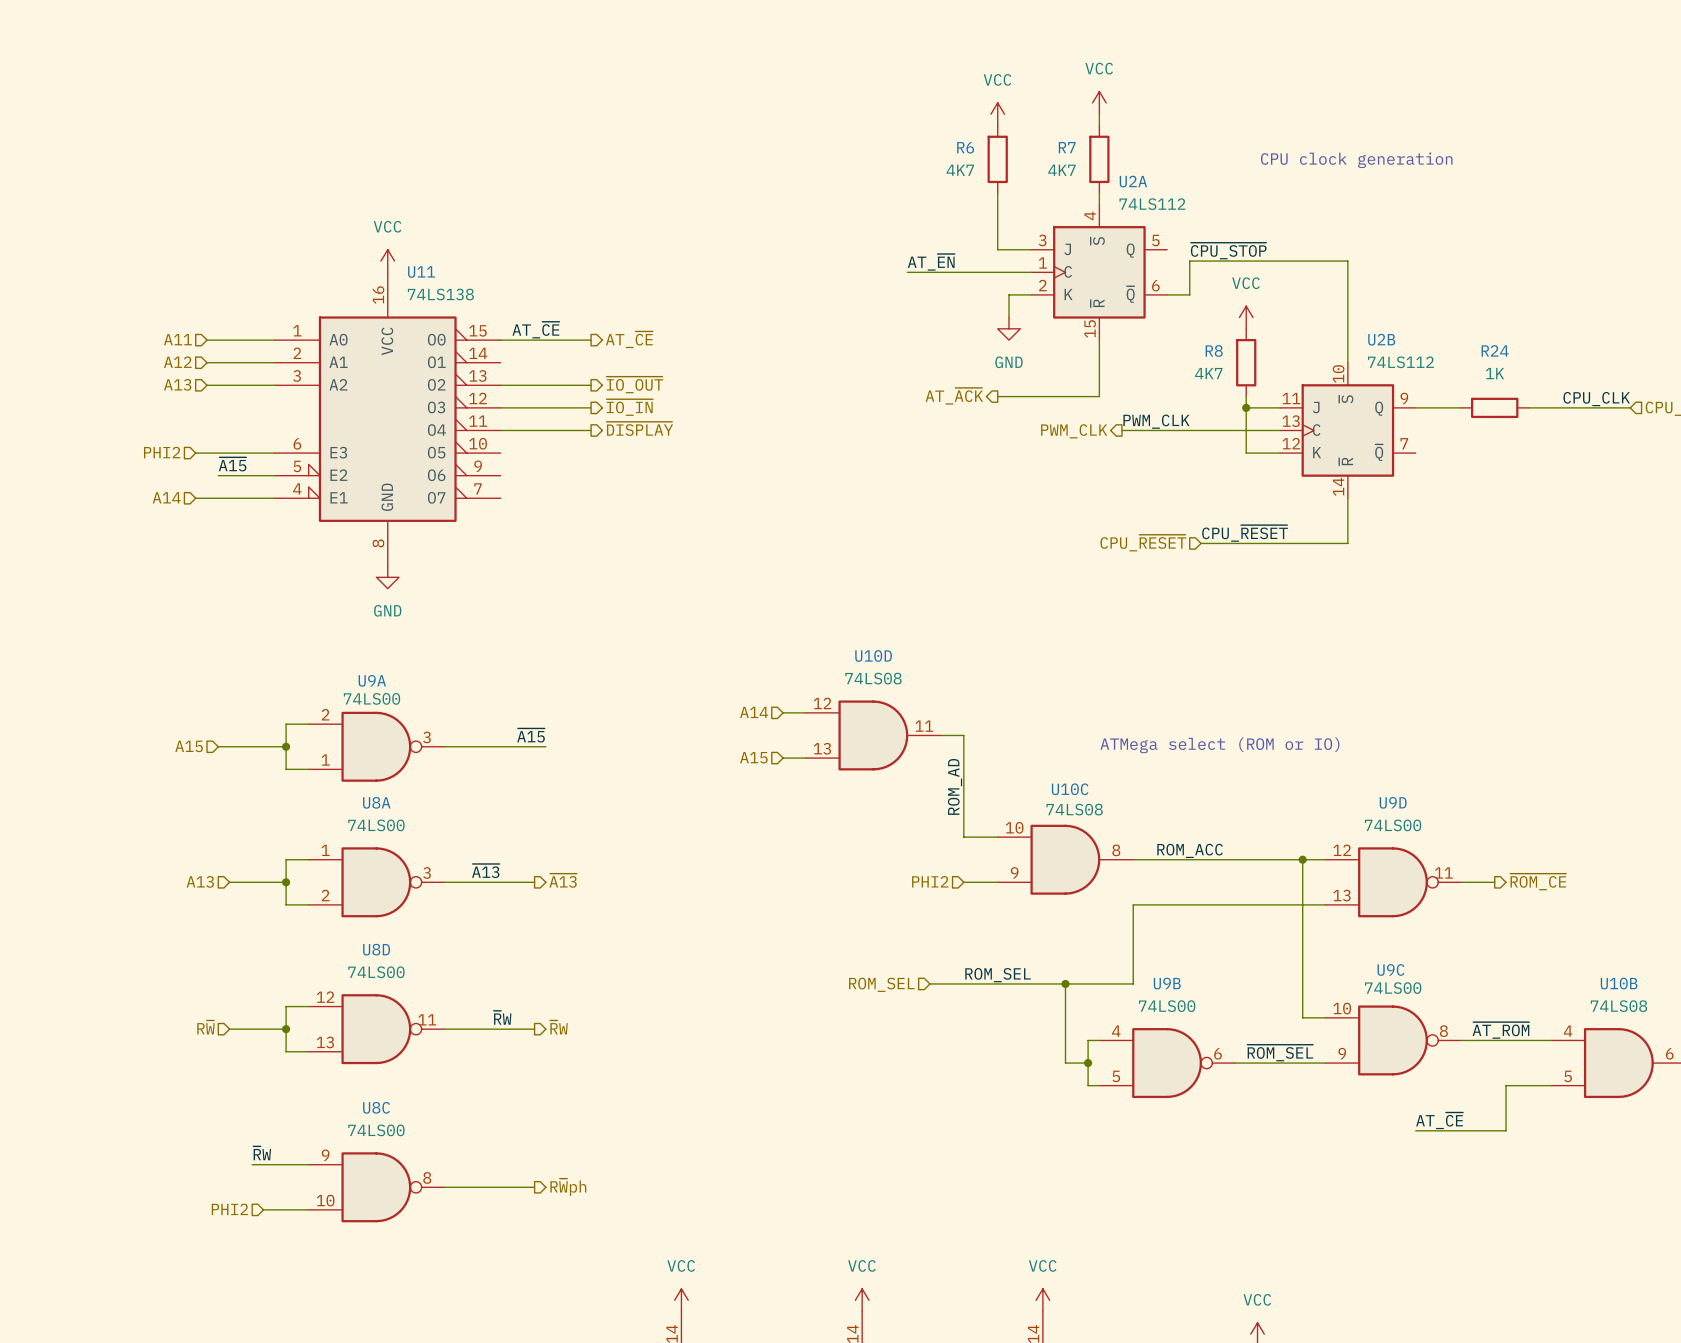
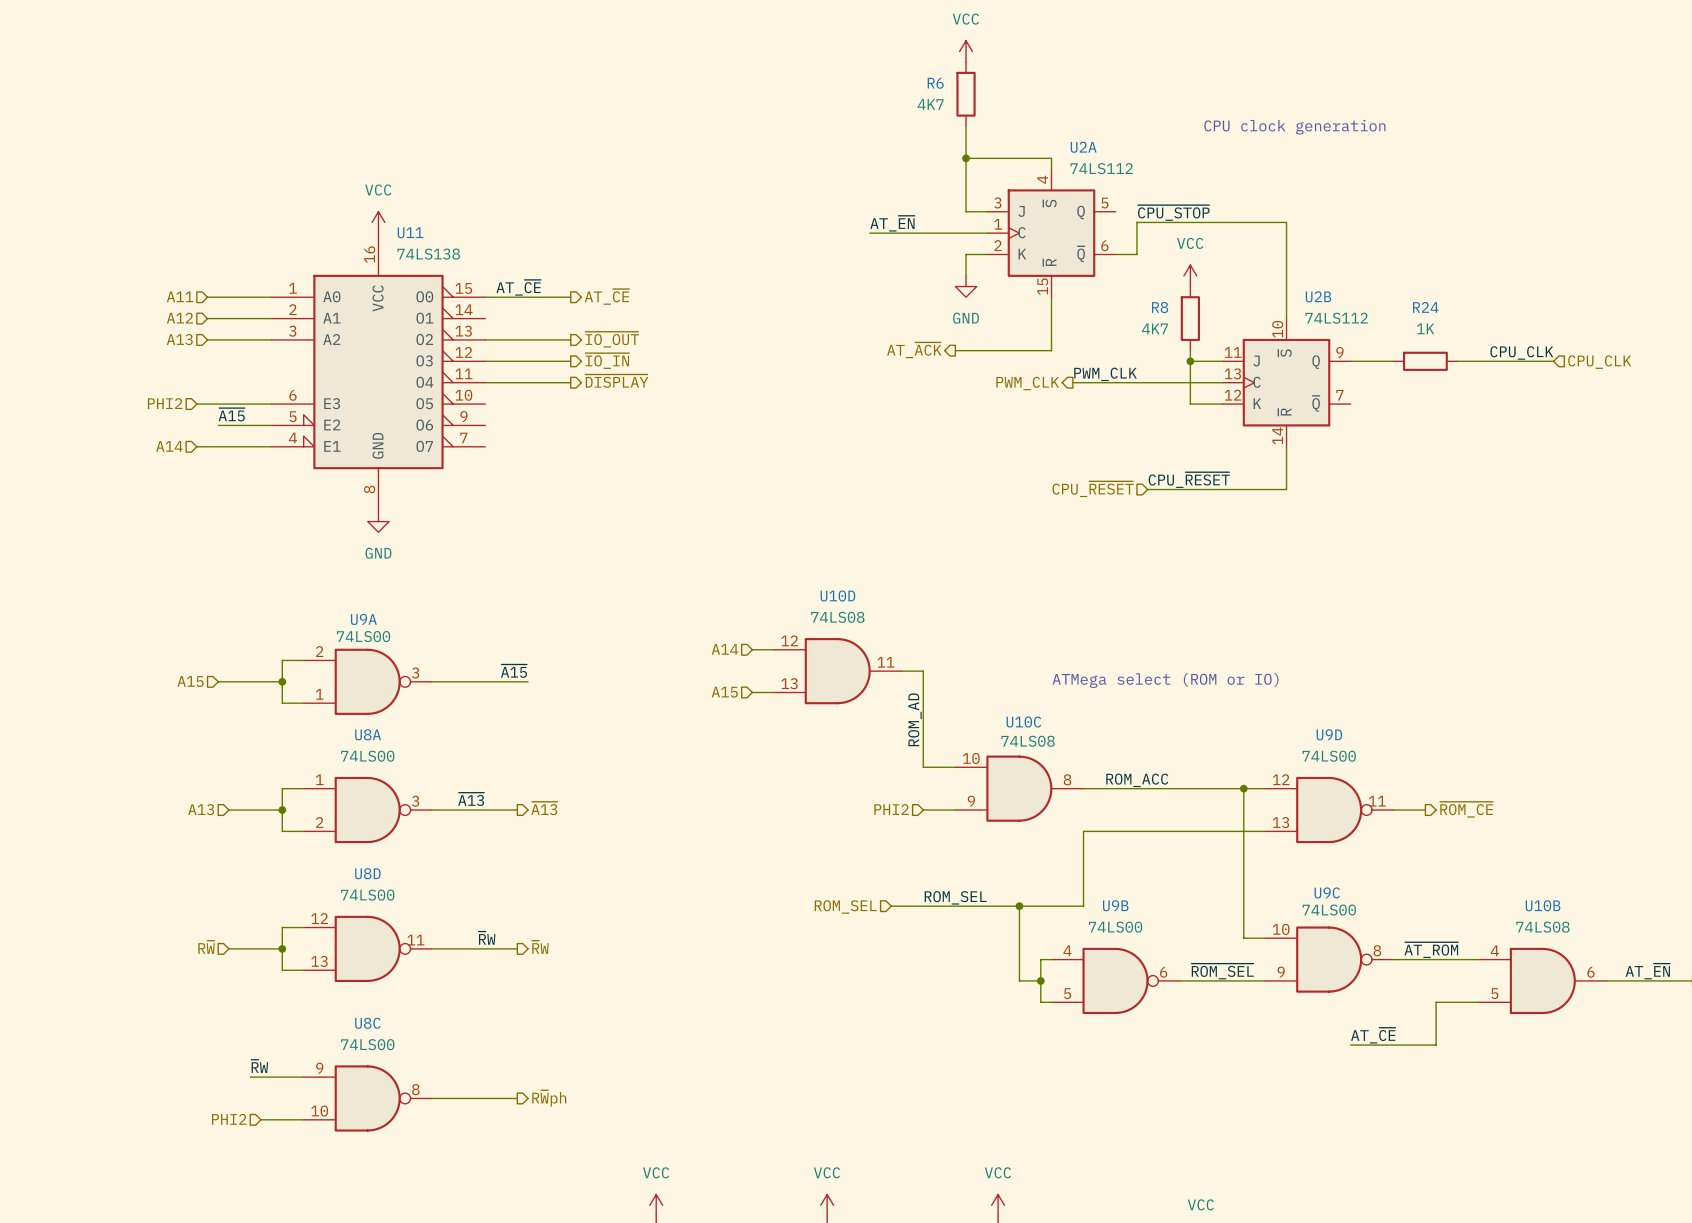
power symbol: VCC (1099, 102) -> none
power symbol position: VCC (997, 114) -> VCC (966, 51)
wire: (1099, 114) (1099, 125) -> none
R6 position: (997, 159) -> (966, 94)
R7: 4K7 (1099, 159) -> none
wire: (997, 193) (997, 249) (1009, 249) -> (966, 126) (966, 211)
wire: none -> (966, 158) (1051, 158)
junction: none -> (966, 158)

